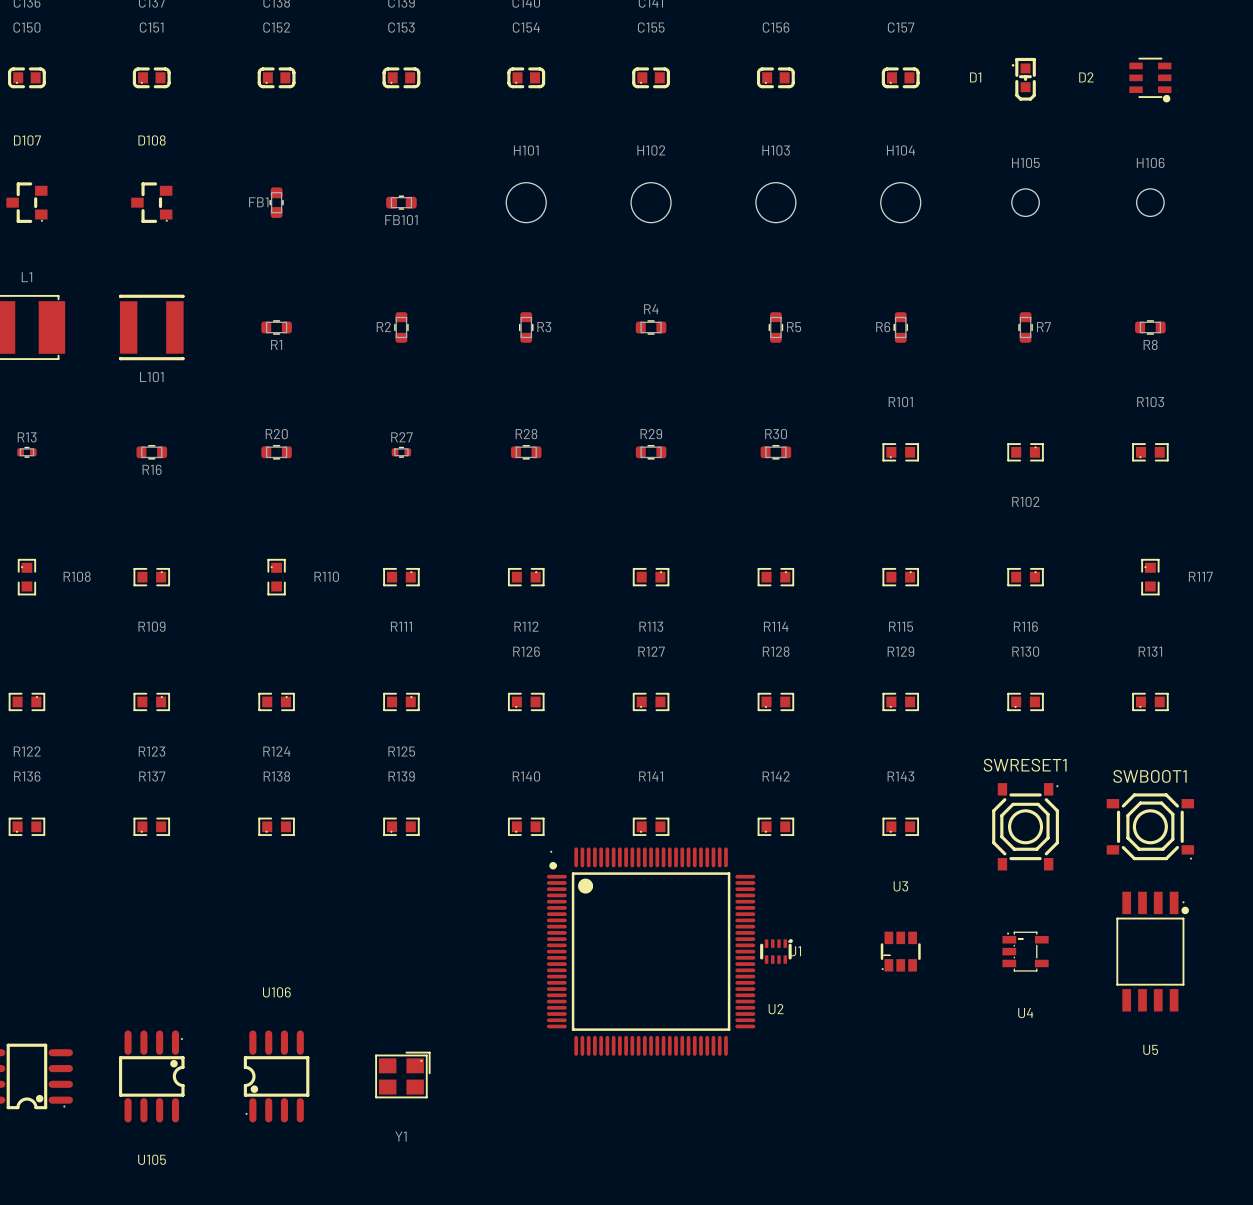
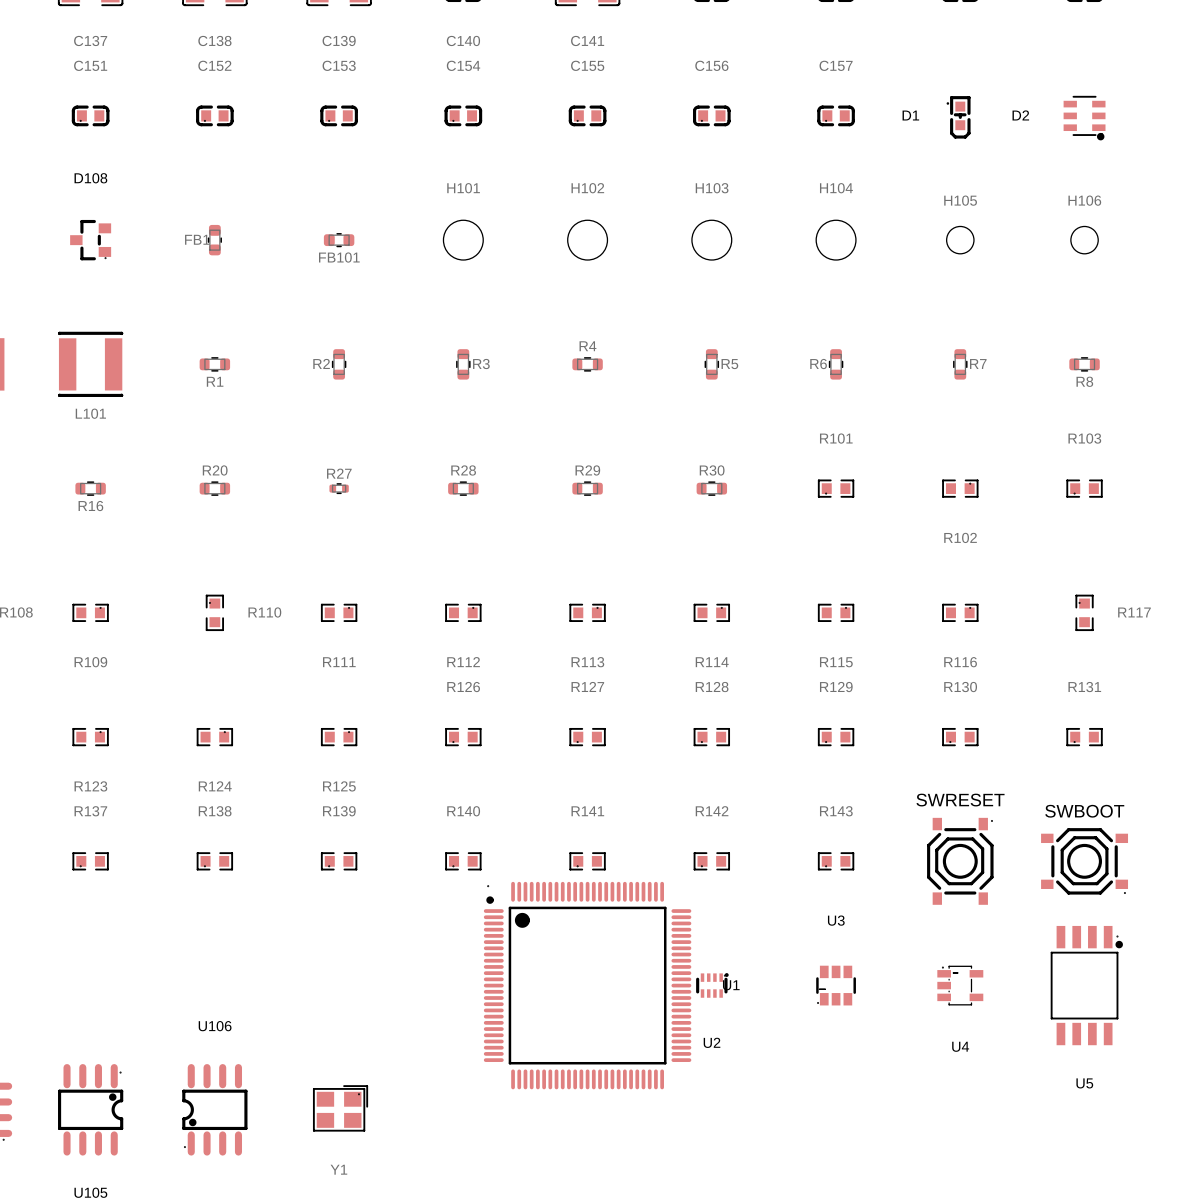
SWRESET1 name: SWRESET1 (1025, 765) -> SWRESET (960, 800)
SWBOOT1 name: SWBOOT1 (1150, 776) -> SWBOOT (1084, 811)

